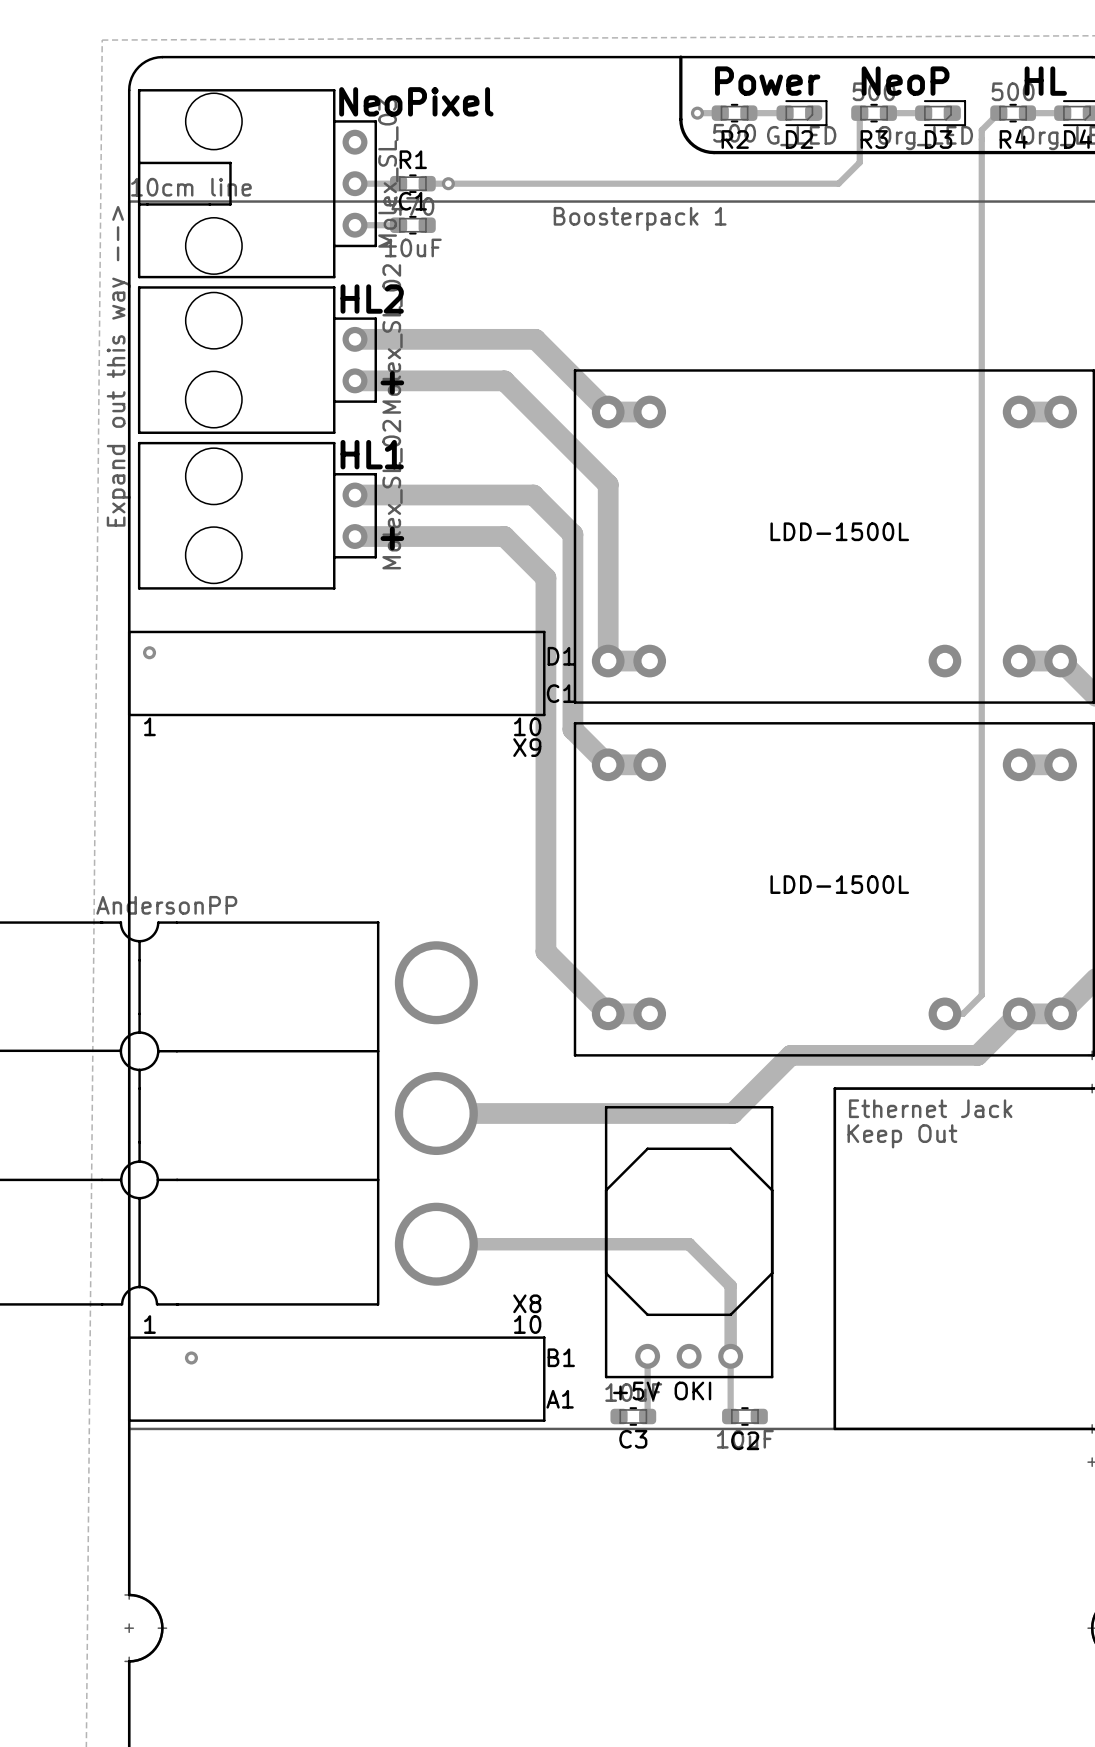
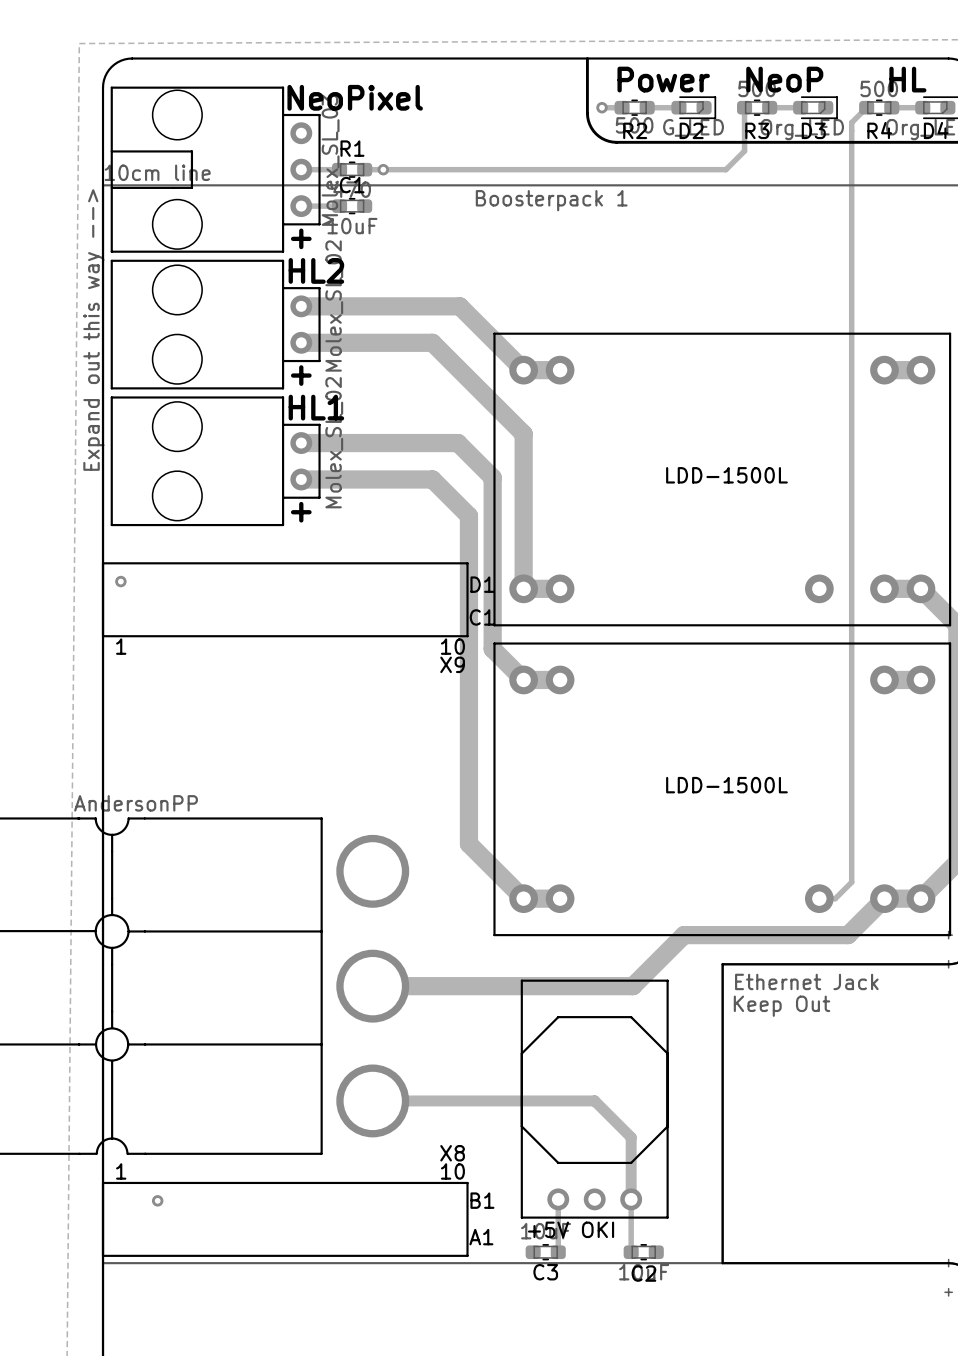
text: none -> + (301, 238)
text position: + (392, 382) -> + (301, 375)
text position: + (392, 538) -> + (301, 512)

